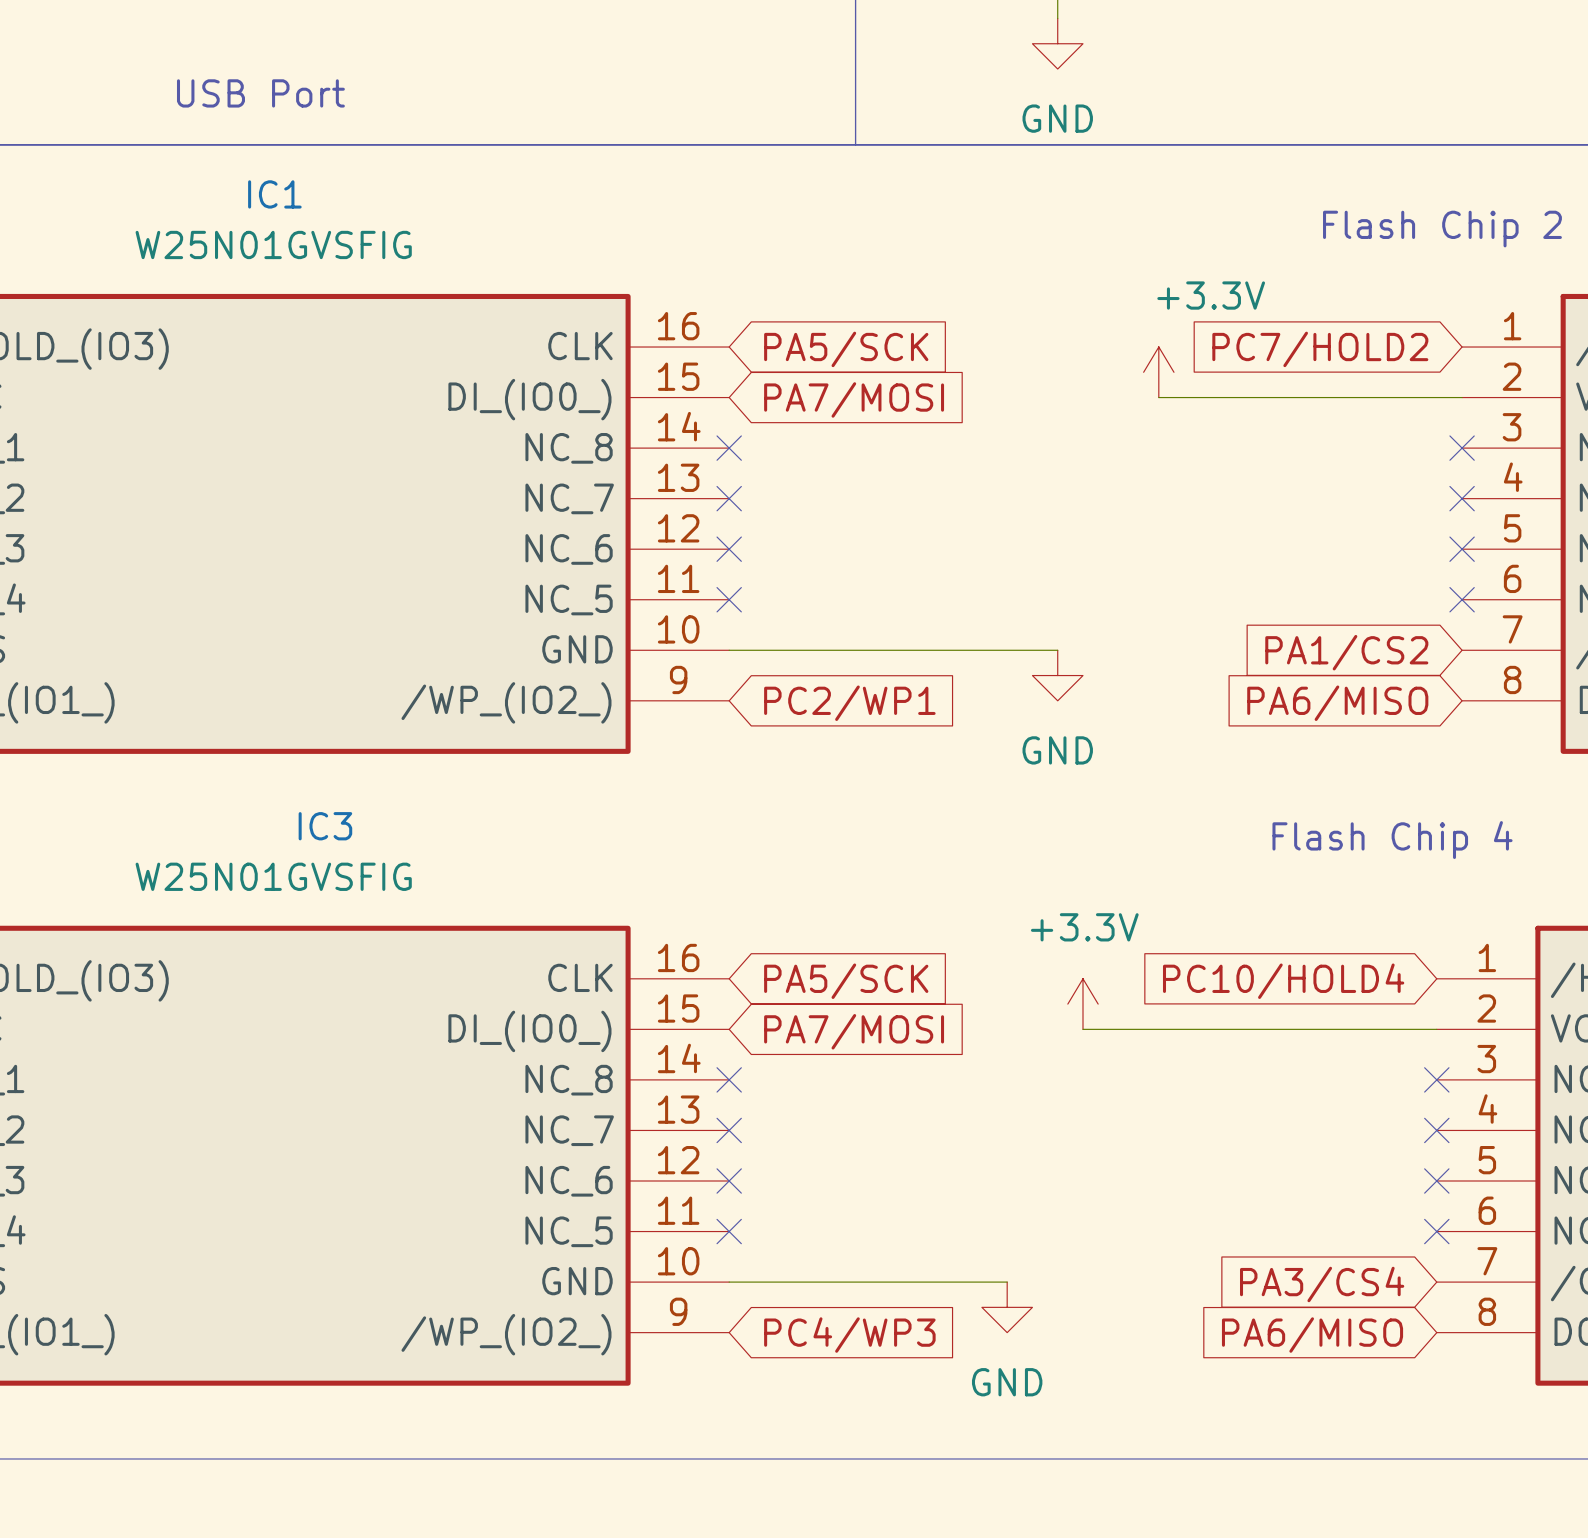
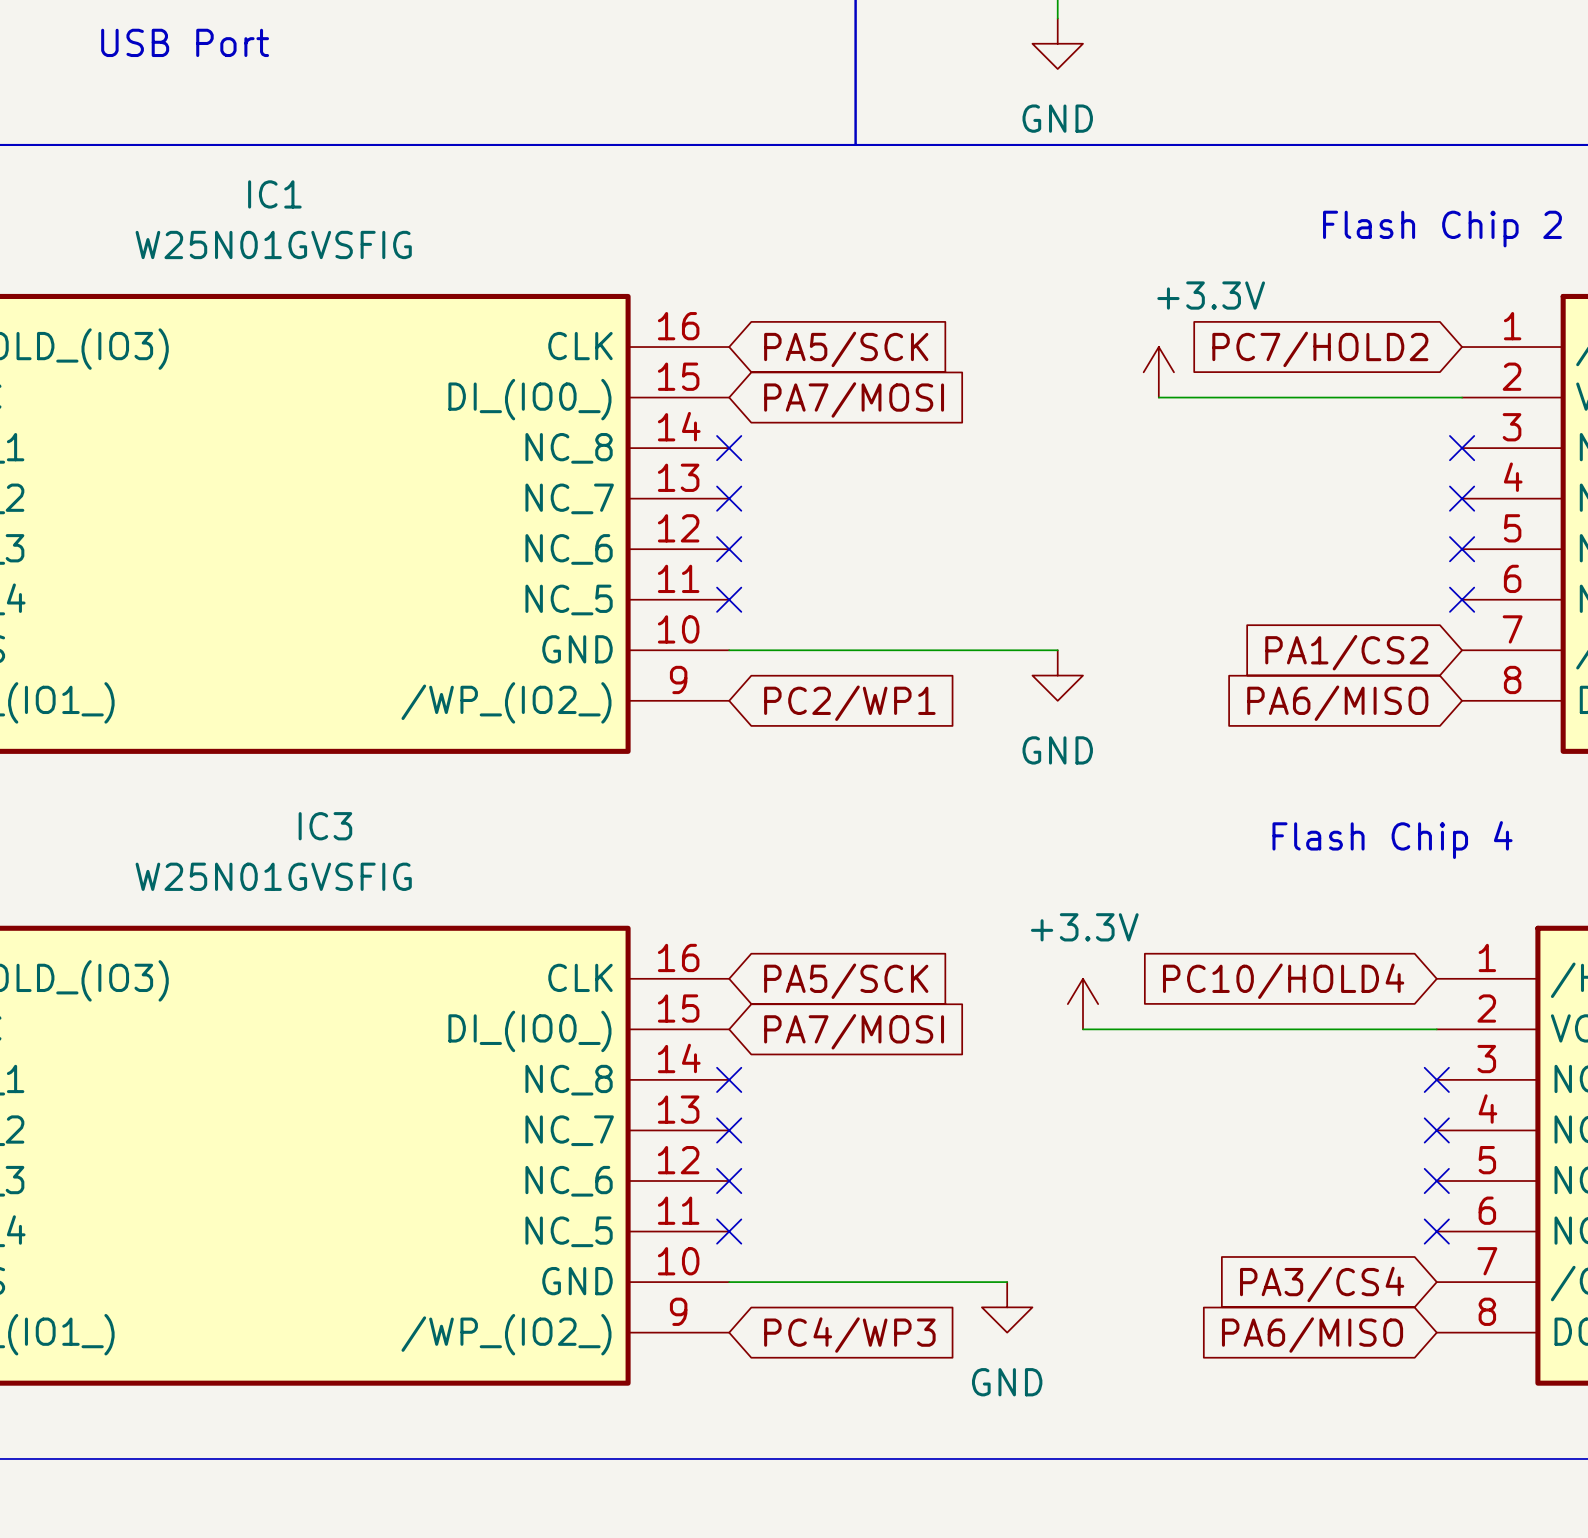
text position: USB Port (260, 93) -> USB Port (185, 42)

